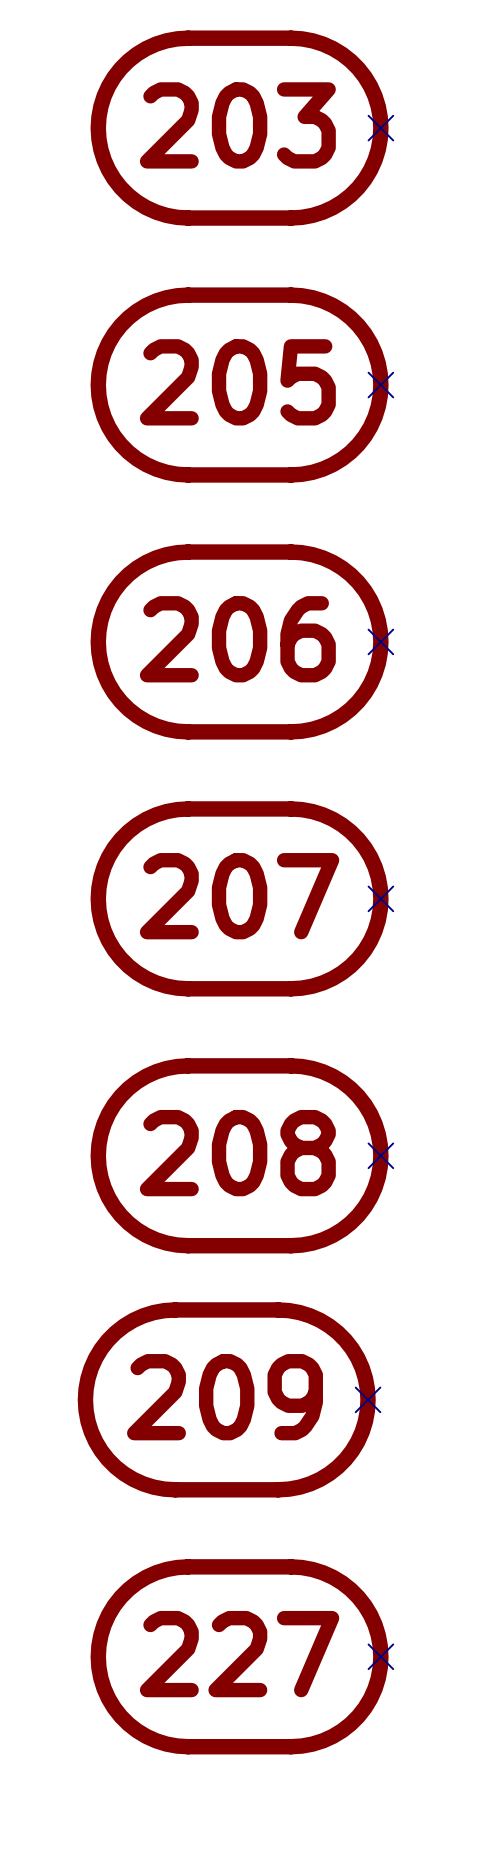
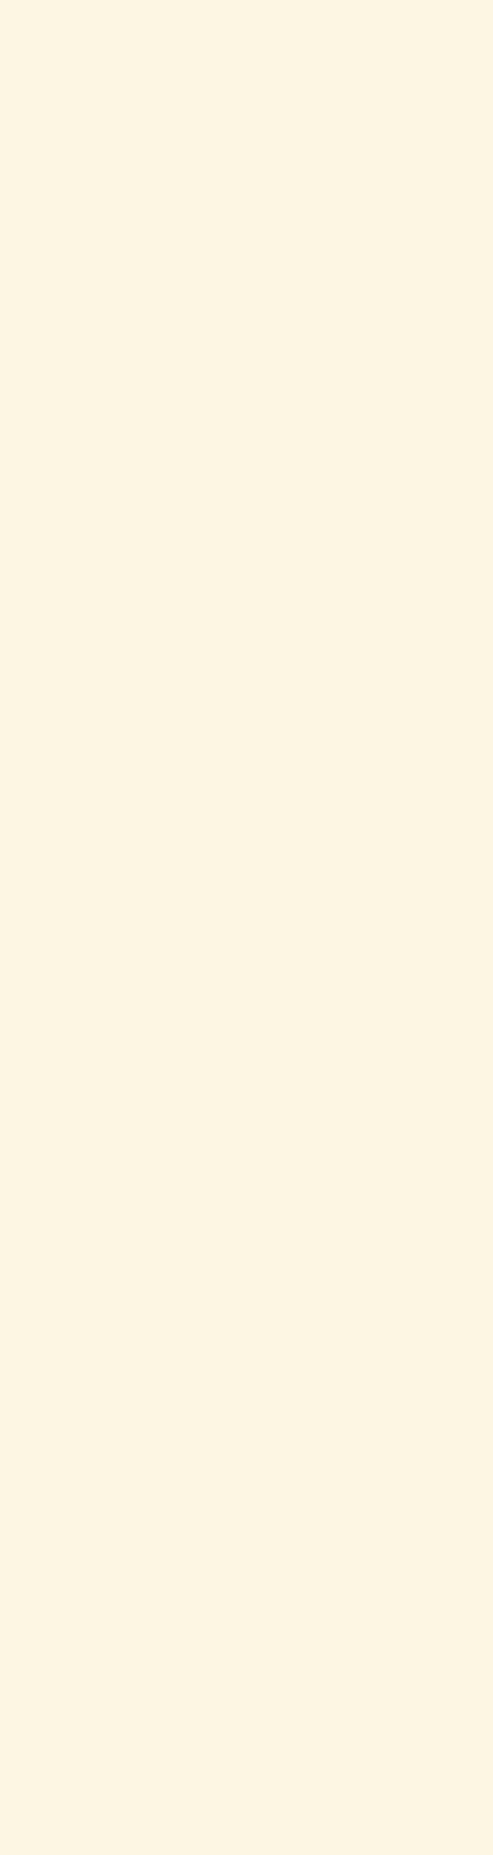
part: (239, 128) -> none
no-connect mark: (380, 128) -> none
part: (239, 385) -> none
no-connect mark: (380, 385) -> none
part: (239, 641) -> none
no-connect mark: (380, 641) -> none
part: (239, 898) -> none
no-connect mark: (380, 898) -> none
part: (239, 1155) -> none
no-connect mark: (380, 1155) -> none
part: (226, 1399) -> none
no-connect mark: (368, 1399) -> none
part: (239, 1656) -> none
no-connect mark: (380, 1656) -> none

